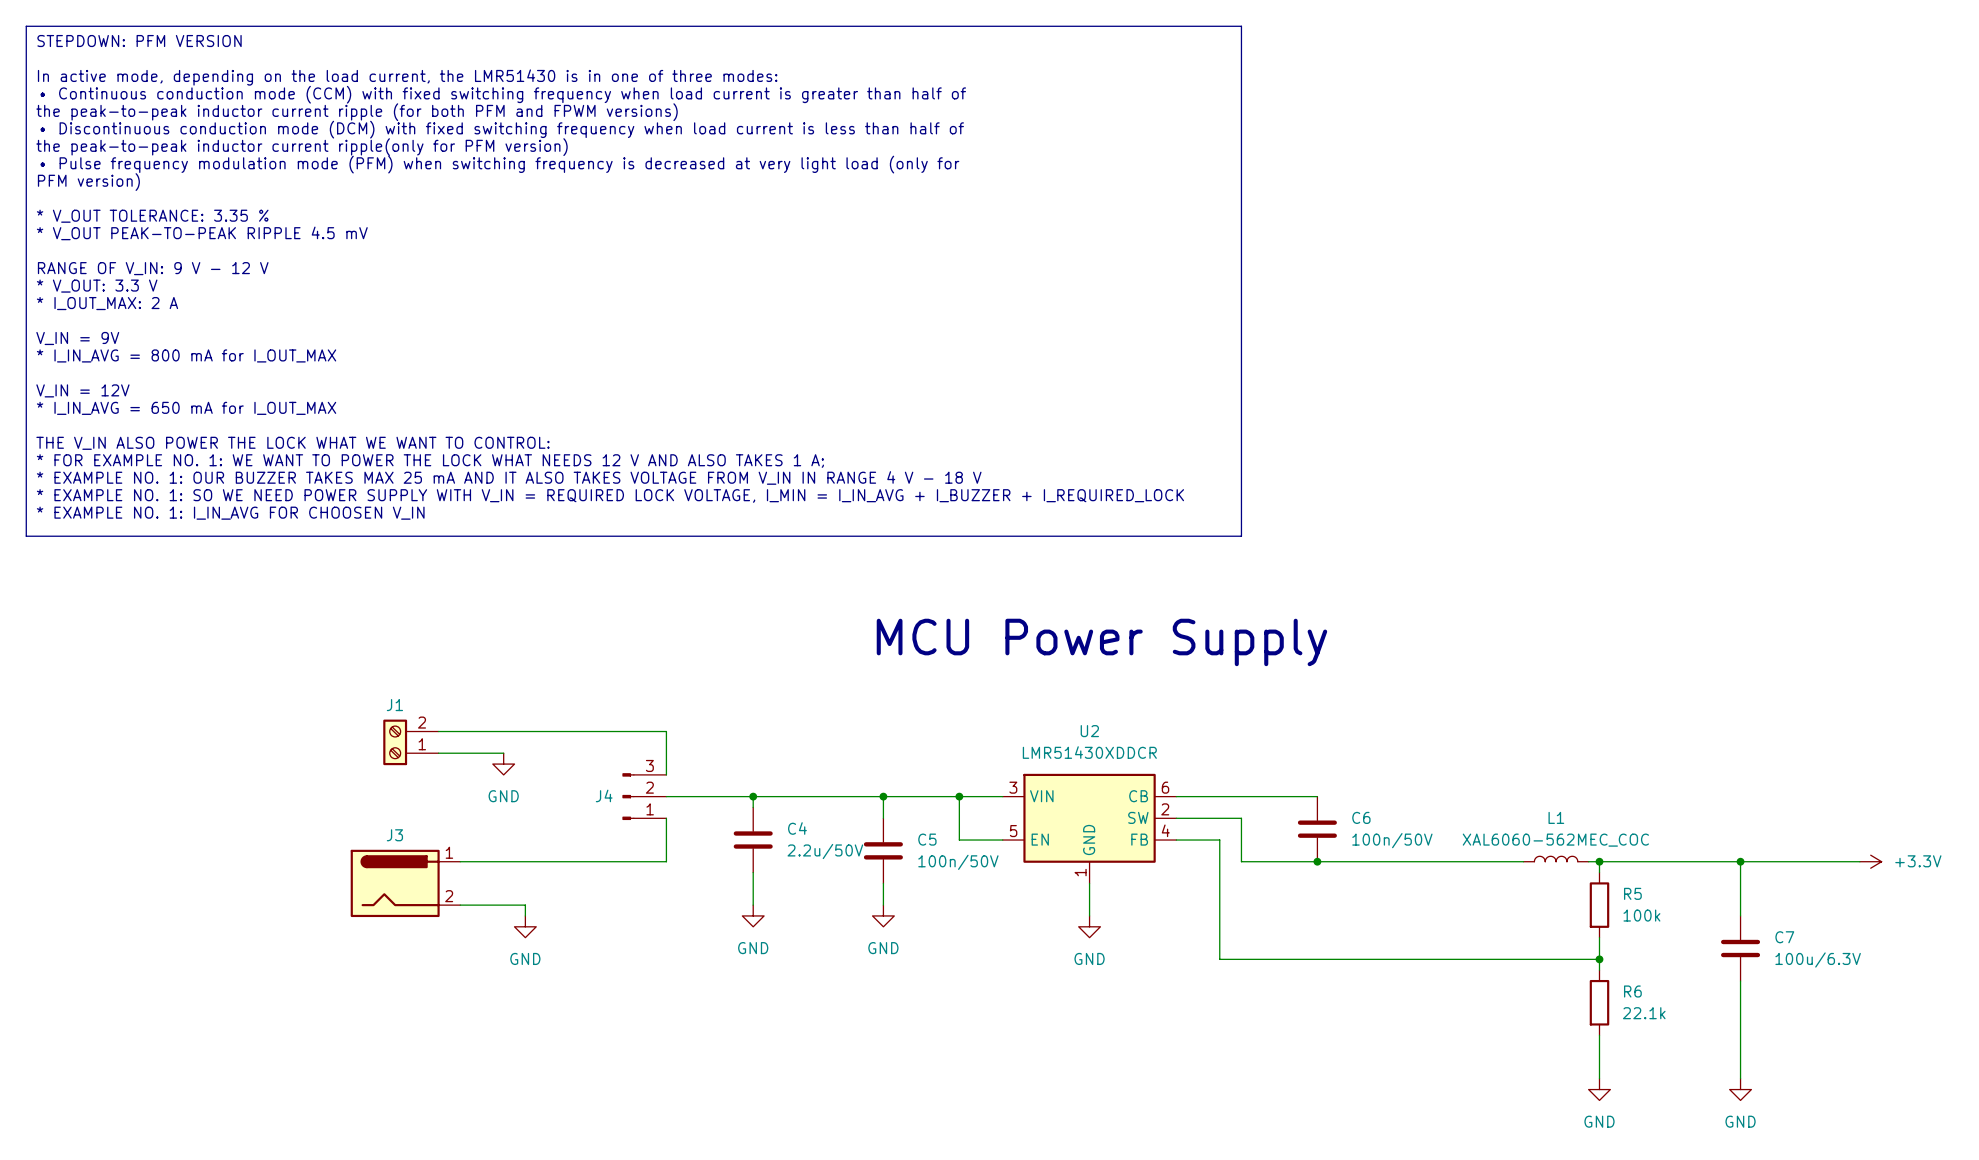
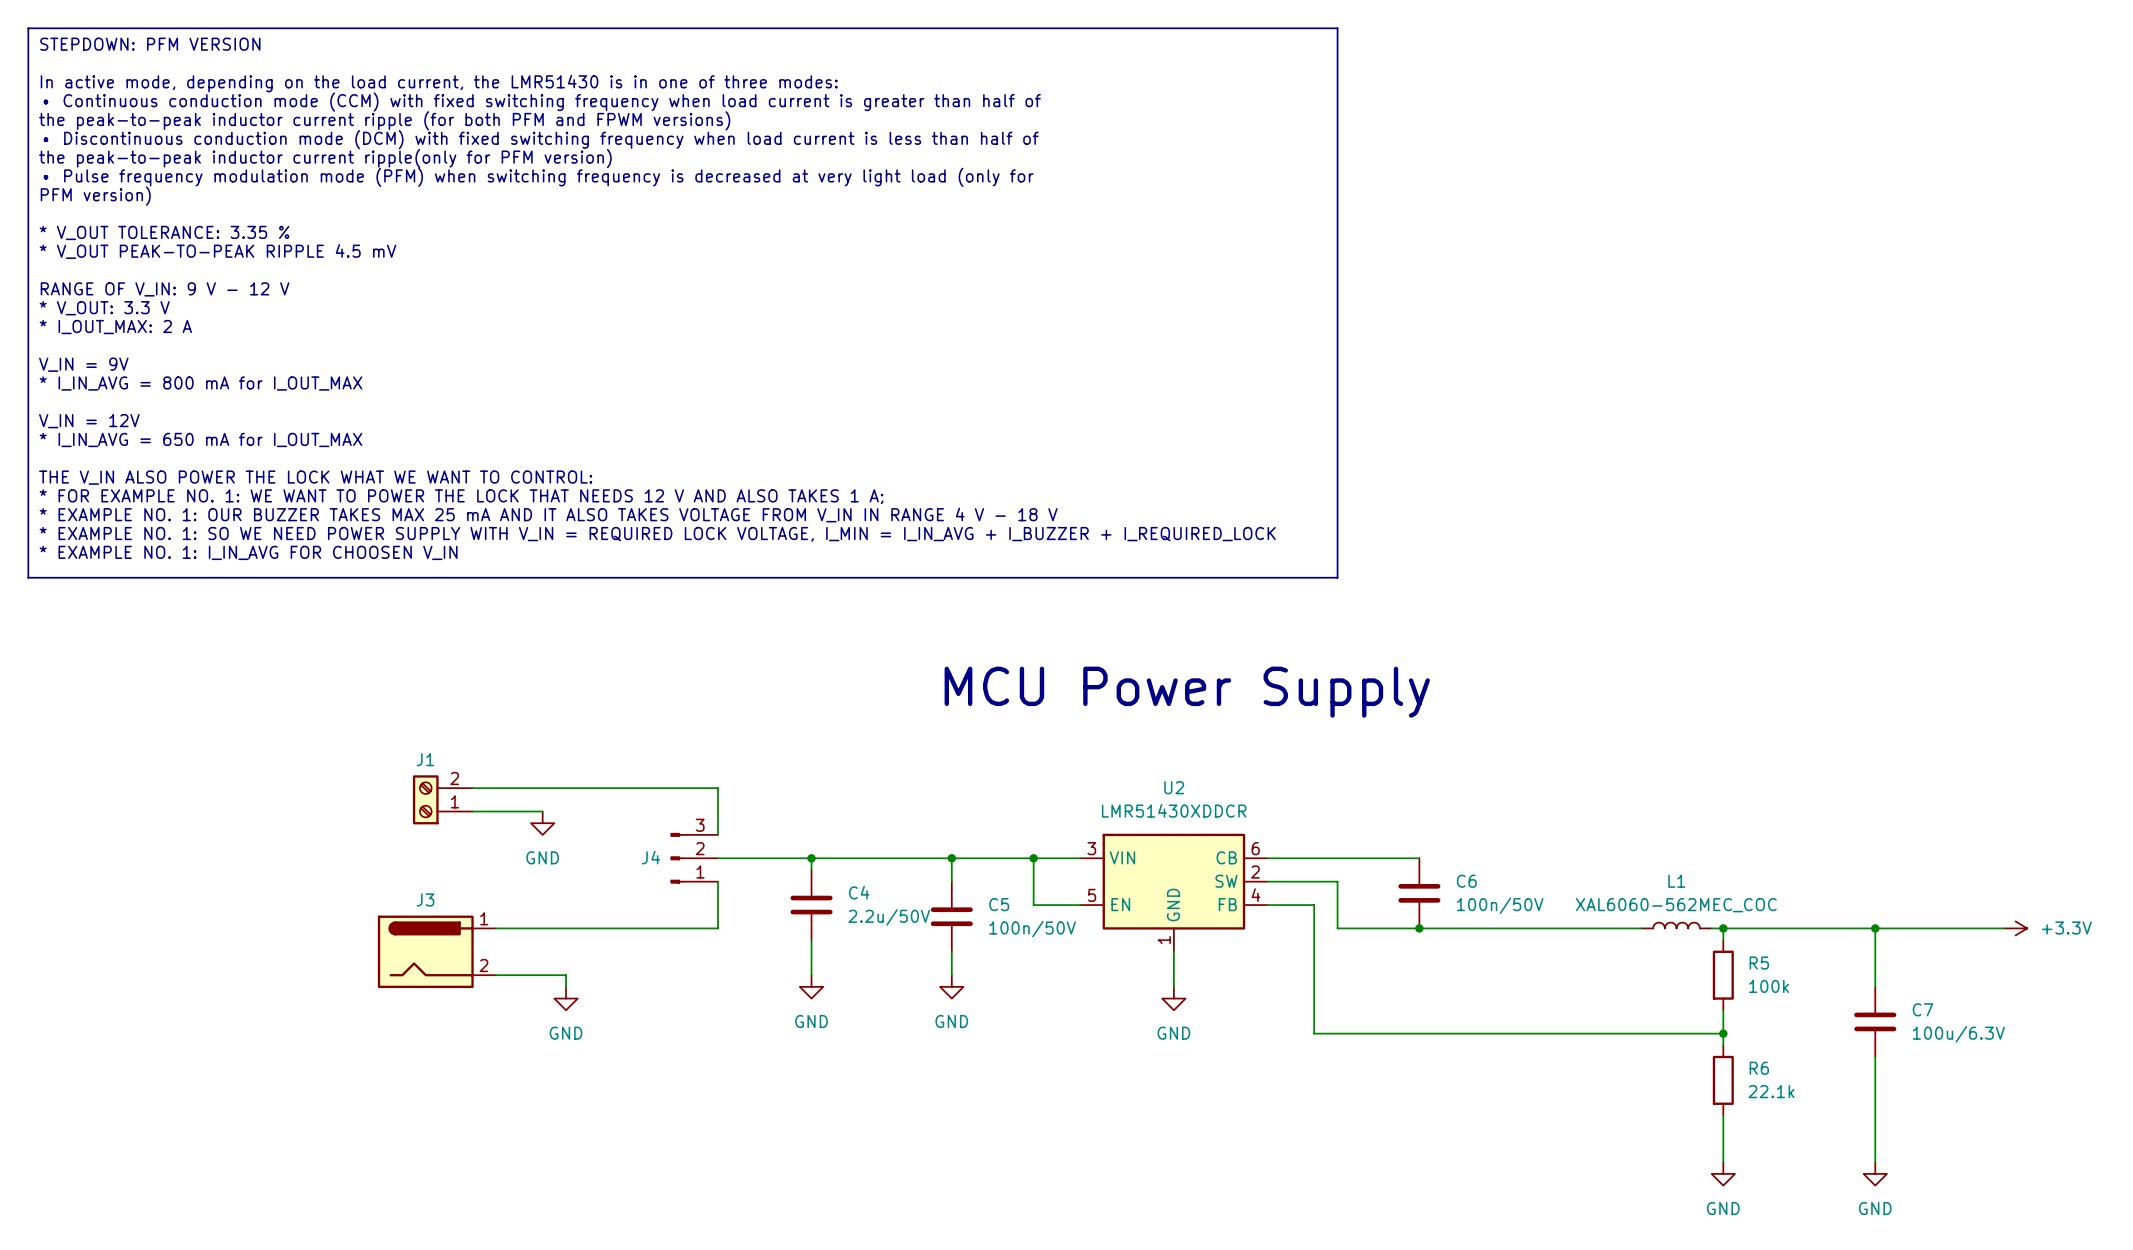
text: * FOR EXAMPLE NO. 1: WE WANT TO POWER THE LOCK WHAT NEEDS 12 V AND ALSO TAKES 1 A; (430, 461) -> * FOR EXAMPLE NO. 1: WE WANT TO POWER THE LOCK THAT NEEDS 12 V AND ALSO TAKES 1 A; (461, 496)

